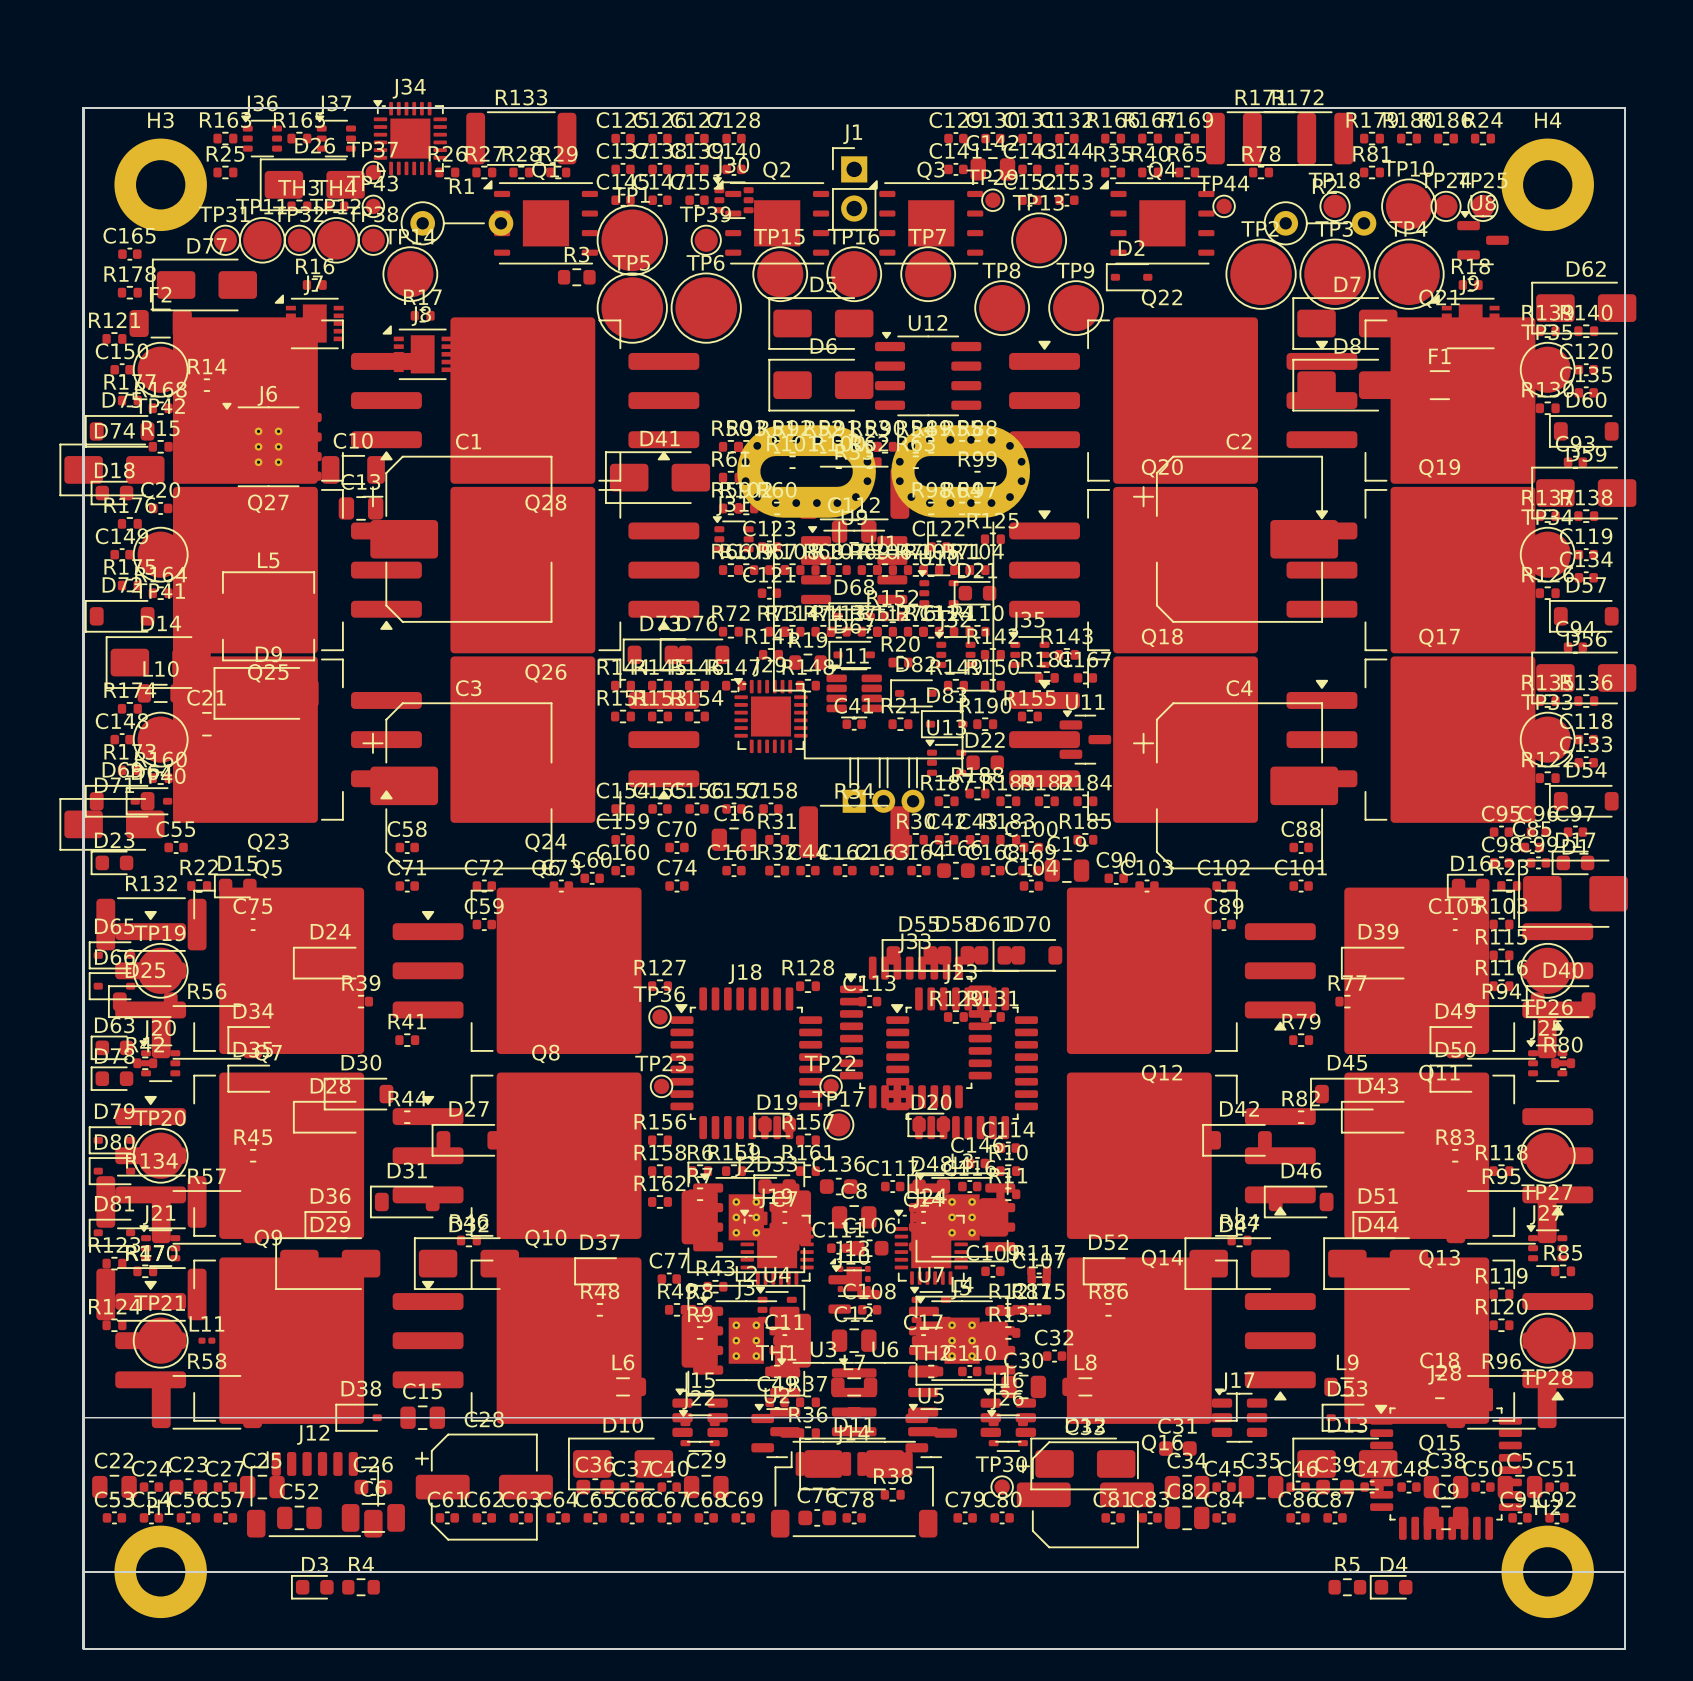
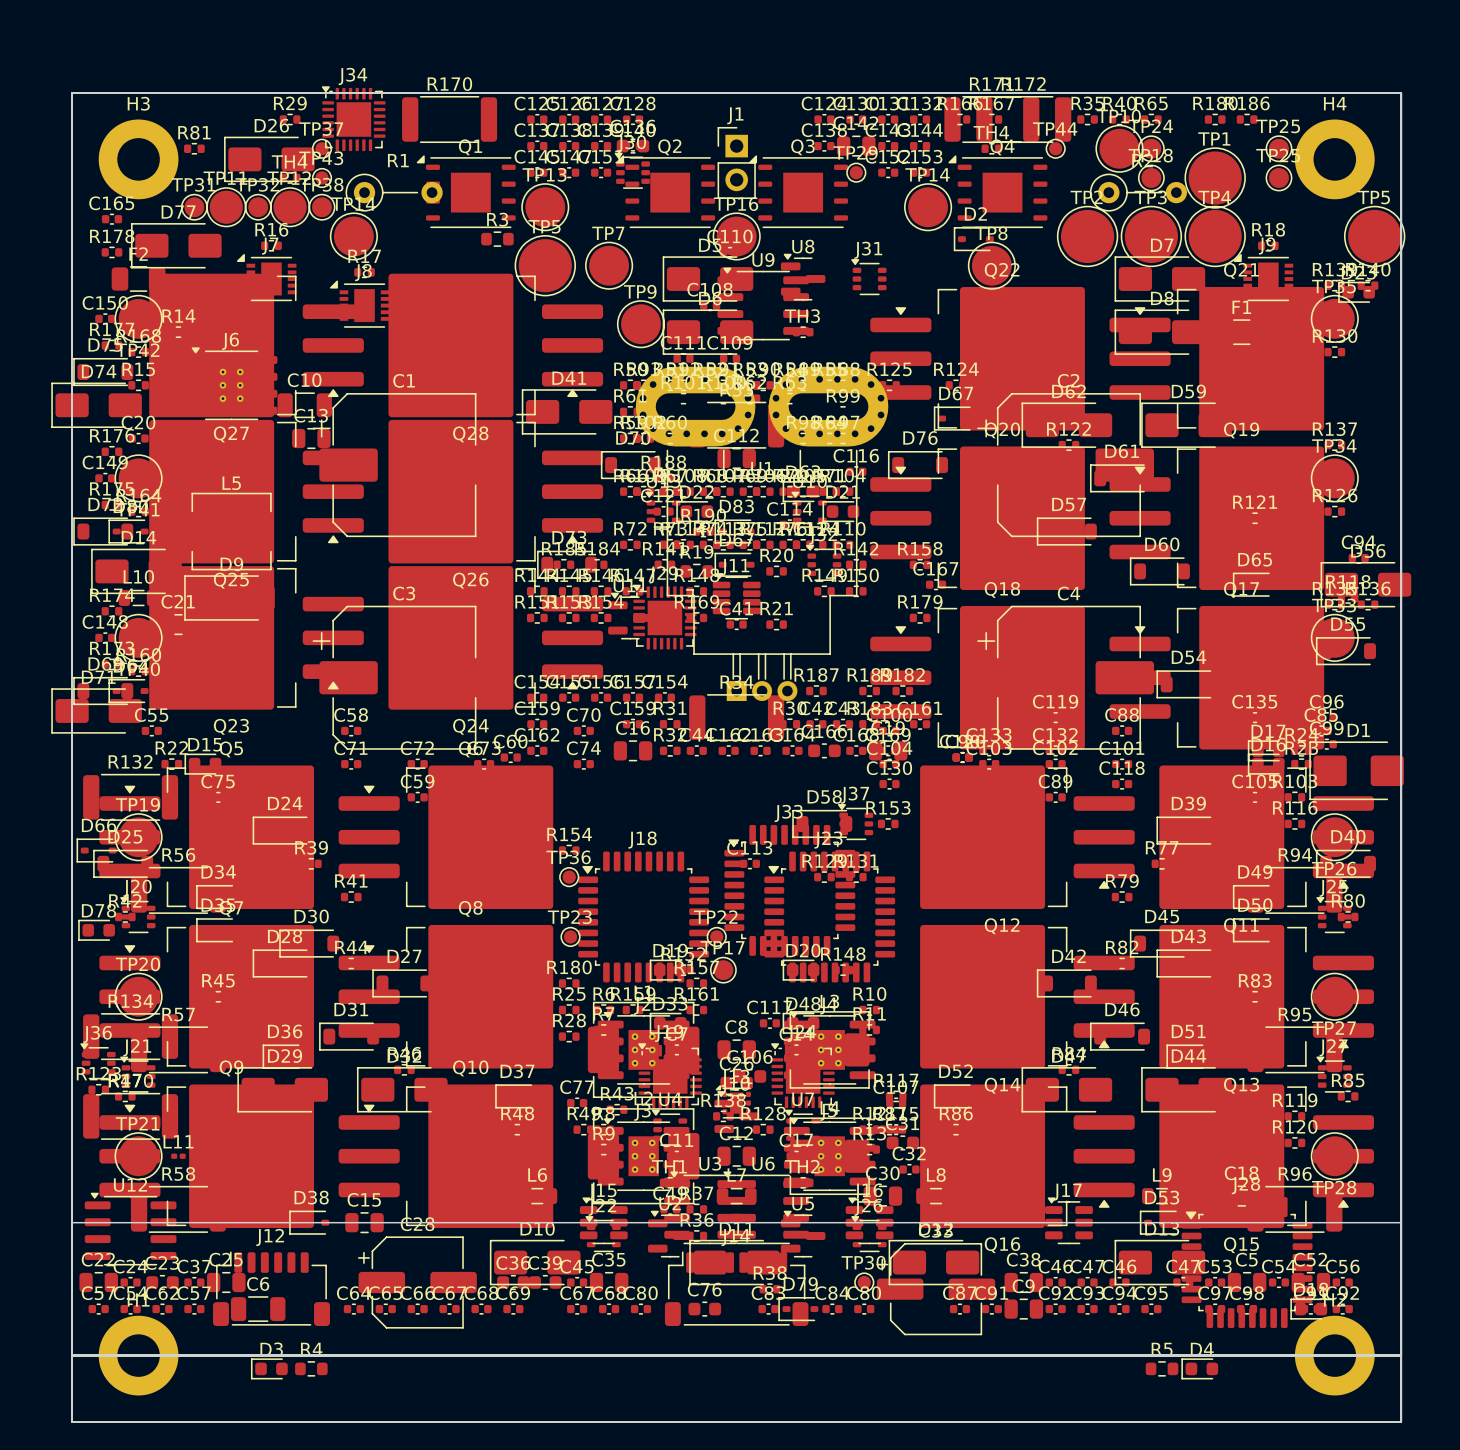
R133 name: R133 (521, 97) -> R170 (449, 84)
C129 name: C129 (955, 120) -> C124 (824, 103)
J36 position: (261, 136) -> (98, 1061)
J37 position: (335, 136) -> (855, 822)
R163: (225, 138) -> none
R165: (299, 138) -> none
R169 position: (1187, 138) -> (696, 617)
R171 position: (1261, 138) -> (991, 119)
R172 position: (1298, 138) -> (1023, 119)
R40: none -> (1119, 119)
R179 position: (1372, 138) -> (920, 617)
R24 position: (1482, 138) -> (1301, 750)
C141 name: C141 (955, 150) -> C138 (824, 130)
R25 name: R25 (225, 153) -> R81 (194, 132)
R40 name: R40 (1150, 153) -> TH4 (991, 132)
R26: (447, 172) -> none
R27: (484, 172) -> none
R28: (521, 172) -> none
R29 position: (558, 172) -> (290, 119)
R35 position: (1113, 172) -> (1087, 119)
R65 position: (1187, 172) -> (1151, 119)
R78: (1261, 172) -> none
R81: (1372, 172) -> none
TP25: none -> (1278, 148)
TH3 position: (299, 206) -> (803, 332)
TP44 position: (1224, 206) -> (1055, 148)
TP10 position: (1409, 206) -> (1119, 148)
TP24 position: (1446, 206) -> (1151, 148)
U8 position: (1482, 238) -> (803, 277)
TP1 position: (632, 240) -> (1215, 177)
TP39: (706, 240) -> none
TP13 position: (1039, 240) -> (545, 207)
TP14: none -> (928, 207)
TP15: (780, 274) -> none
TP7 position: (928, 274) -> (609, 265)
TP5: none -> (1374, 236)
TP6: (706, 308) -> none
TP8 position: (1002, 308) -> (991, 265)
TP9 position: (1076, 308) -> (640, 324)
D62 position: (1583, 308) -> (1066, 425)
R121 position: (114, 338) -> (1255, 518)
C120 position: (1586, 369) -> (962, 757)
U12 position: (928, 374) -> (130, 1229)
C135 position: (1586, 392) -> (1255, 717)
Q22 position: (1133, 400) -> (977, 358)
Q21 position: (1410, 400) -> (1216, 358)
D60 position: (1583, 431) -> (1159, 571)
C93 position: (1575, 462) -> (1087, 1309)
D67: none -> (953, 418)
D18 position: (111, 493) -> (1308, 1309)
D59 position: (1583, 493) -> (1186, 425)
R138 position: (1586, 516) -> (723, 1116)
J31 position: (733, 537) -> (868, 277)
R125 position: (992, 539) -> (889, 385)
C123: (769, 546) -> none
C122: (938, 546) -> none
C119 position: (1586, 554) -> (1055, 717)
U9 position: (854, 568) -> (763, 304)
Q20 position: (1133, 570) -> (977, 518)
Q19 position: (1410, 570) -> (1216, 518)
C134: (1586, 577) -> none
D68 name: D68 (854, 587) -> D83 (736, 506)
R152 position: (892, 616) -> (683, 970)
D57 position: (1583, 616) -> (1066, 531)
R143 name: R143 (1067, 636) -> R158 (920, 548)
J35: (1029, 652) -> none
D76 position: (694, 654) -> (917, 465)
R181: (1046, 677) -> none
D82: (913, 693) -> none
R155: (1029, 716) -> none
D83: (944, 724) -> none
R190 position: (985, 724) -> (703, 531)
U11 position: (1085, 737) -> (630, 616)
Q18 position: (1133, 739) -> (977, 677)
Q17 position: (1410, 739) -> (1216, 677)
C118 position: (1586, 739) -> (1122, 784)
U13 position: (945, 760) -> (662, 509)
D22 position: (982, 762) -> (694, 511)
C133 position: (1586, 762) -> (989, 750)
R122 position: (1547, 778) -> (1068, 445)
C158 name: C158 (770, 790) -> C154 (664, 681)
R188 position: (977, 793) -> (663, 478)
R184 position: (1085, 801) -> (597, 564)
D54 position: (1583, 801) -> (1186, 684)
C95: (1501, 832) -> none
C97 position: (1575, 832) -> (1215, 1309)
C16 position: (733, 839) -> (633, 750)
C159: none -> (633, 724)
R185 position: (1085, 839) -> (563, 564)
C160 name: C160 (622, 852) -> C162 (536, 734)
D23 position: (111, 862) -> (1356, 292)
C98 position: (1501, 862) -> (1247, 1309)
D17 position: (1573, 862) -> (1266, 750)
C161 position: (733, 870) -> (920, 724)
C19 position: (1066, 870) -> (888, 750)
C132: none -> (1055, 750)
C130: none -> (889, 784)
R115 name: R115 (1501, 936) -> R116 (1295, 807)
D65 position: (111, 955) -> (1252, 584)
D55 position: (916, 955) -> (1345, 651)
D61 position: (990, 955) -> (1120, 478)
D70 position: (1027, 955) -> (630, 465)
R153: none -> (888, 823)
R127 name: R127 (660, 967) -> R154 (569, 834)
R128 position: (807, 986) -> (763, 1129)
R116: (1501, 986) -> none
D63 position: (111, 1047) -> (801, 491)
R156 name: R156 (660, 1121) -> R180 (569, 967)
R148: none -> (843, 970)
D79 position: (111, 1140) -> (798, 1309)
C114 position: (1008, 1148) -> (789, 524)
R158 name: R158 (660, 1152) -> R25 (569, 993)
C146: (977, 1163) -> none
D80 position: (111, 1171) -> (128, 531)
R118 position: (1501, 1171) -> (1348, 597)
R162 name: R162 (659, 1183) -> R28 (569, 1020)
C136 position: (838, 1186) -> (633, 146)
C116 position: (969, 1186) -> (856, 471)
D81: (111, 1232) -> none
C111 position: (838, 1248) -> (683, 358)
C109 position: (992, 1271) -> (730, 358)
C108 position: (869, 1309) -> (710, 305)
R124 position: (114, 1325) -> (955, 385)
C110 position: (969, 1371) -> (730, 252)
C31 position: (1177, 1448) -> (902, 1142)
C29 name: C29 (706, 1460) -> C35 (608, 1259)
C34 name: C34 (1187, 1460) -> C38 (1023, 1259)
C38 name: C38 (1445, 1460) -> C5 (1246, 1259)
C5 name: C5 (1519, 1460) -> C52 (1310, 1259)
C27 name: C27 (225, 1468) -> C37 (194, 1266)
C40 name: C40 (669, 1468) -> C45 (576, 1266)
C45 name: C45 (1223, 1468) -> C46 (1055, 1266)
C48 name: C48 (1408, 1468) -> C53 (1214, 1266)
C50 name: C50 (1482, 1468) -> C54 (1278, 1266)
C51 name: C51 (1556, 1468) -> C56 (1342, 1266)
C26 position: (373, 1487) -> (736, 1083)
C37: (632, 1487) -> none
C35: (1261, 1487) -> none
C47: none -> (1087, 1282)
C39 position: (1335, 1487) -> (545, 1282)
C82 name: C82 (1186, 1491) -> C9 (1023, 1286)
C53 name: C53 (114, 1499) -> C57 (98, 1293)
C56 name: C56 (188, 1499) -> C62 (162, 1293)
C61 name: C61 (446, 1499) -> C65 (385, 1293)
C62 name: C62 (483, 1499) -> C66 (417, 1293)
C63 name: C63 (521, 1499) -> C67 (449, 1293)
C64 name: C64 (558, 1499) -> C68 (481, 1293)
C65 name: C65 (594, 1499) -> C69 (513, 1293)
C69 name: C69 (743, 1499) -> C80 (640, 1293)
C79 name: C79 (965, 1499) -> C84 (832, 1293)
C81 name: C81 (1112, 1499) -> C87 (959, 1293)
C83 name: C83 (1149, 1499) -> C91 (991, 1293)
C84 name: C84 (1224, 1499) -> C92 (1055, 1293)
C86 name: C86 (1297, 1499) -> C94 (1119, 1293)
C87 name: C87 (1334, 1499) -> C95 (1151, 1293)
C52: (299, 1517) -> none
C6 position: (373, 1517) -> (258, 1309)
C64: none -> (353, 1309)
C66: (632, 1517) -> none
C78: (854, 1517) -> none
C83: none -> (768, 1309)
C9: (1446, 1517) -> none

